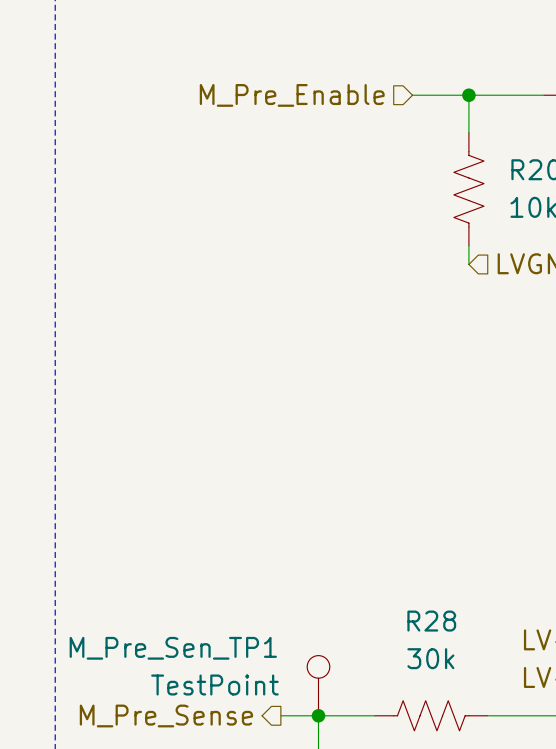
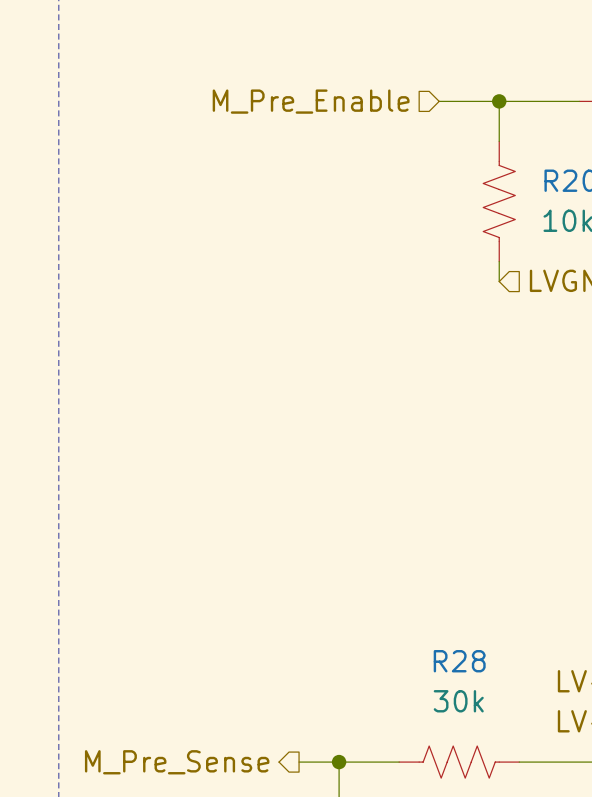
M_Pre_Sen_TP1: TestPoint (318, 685) -> none

